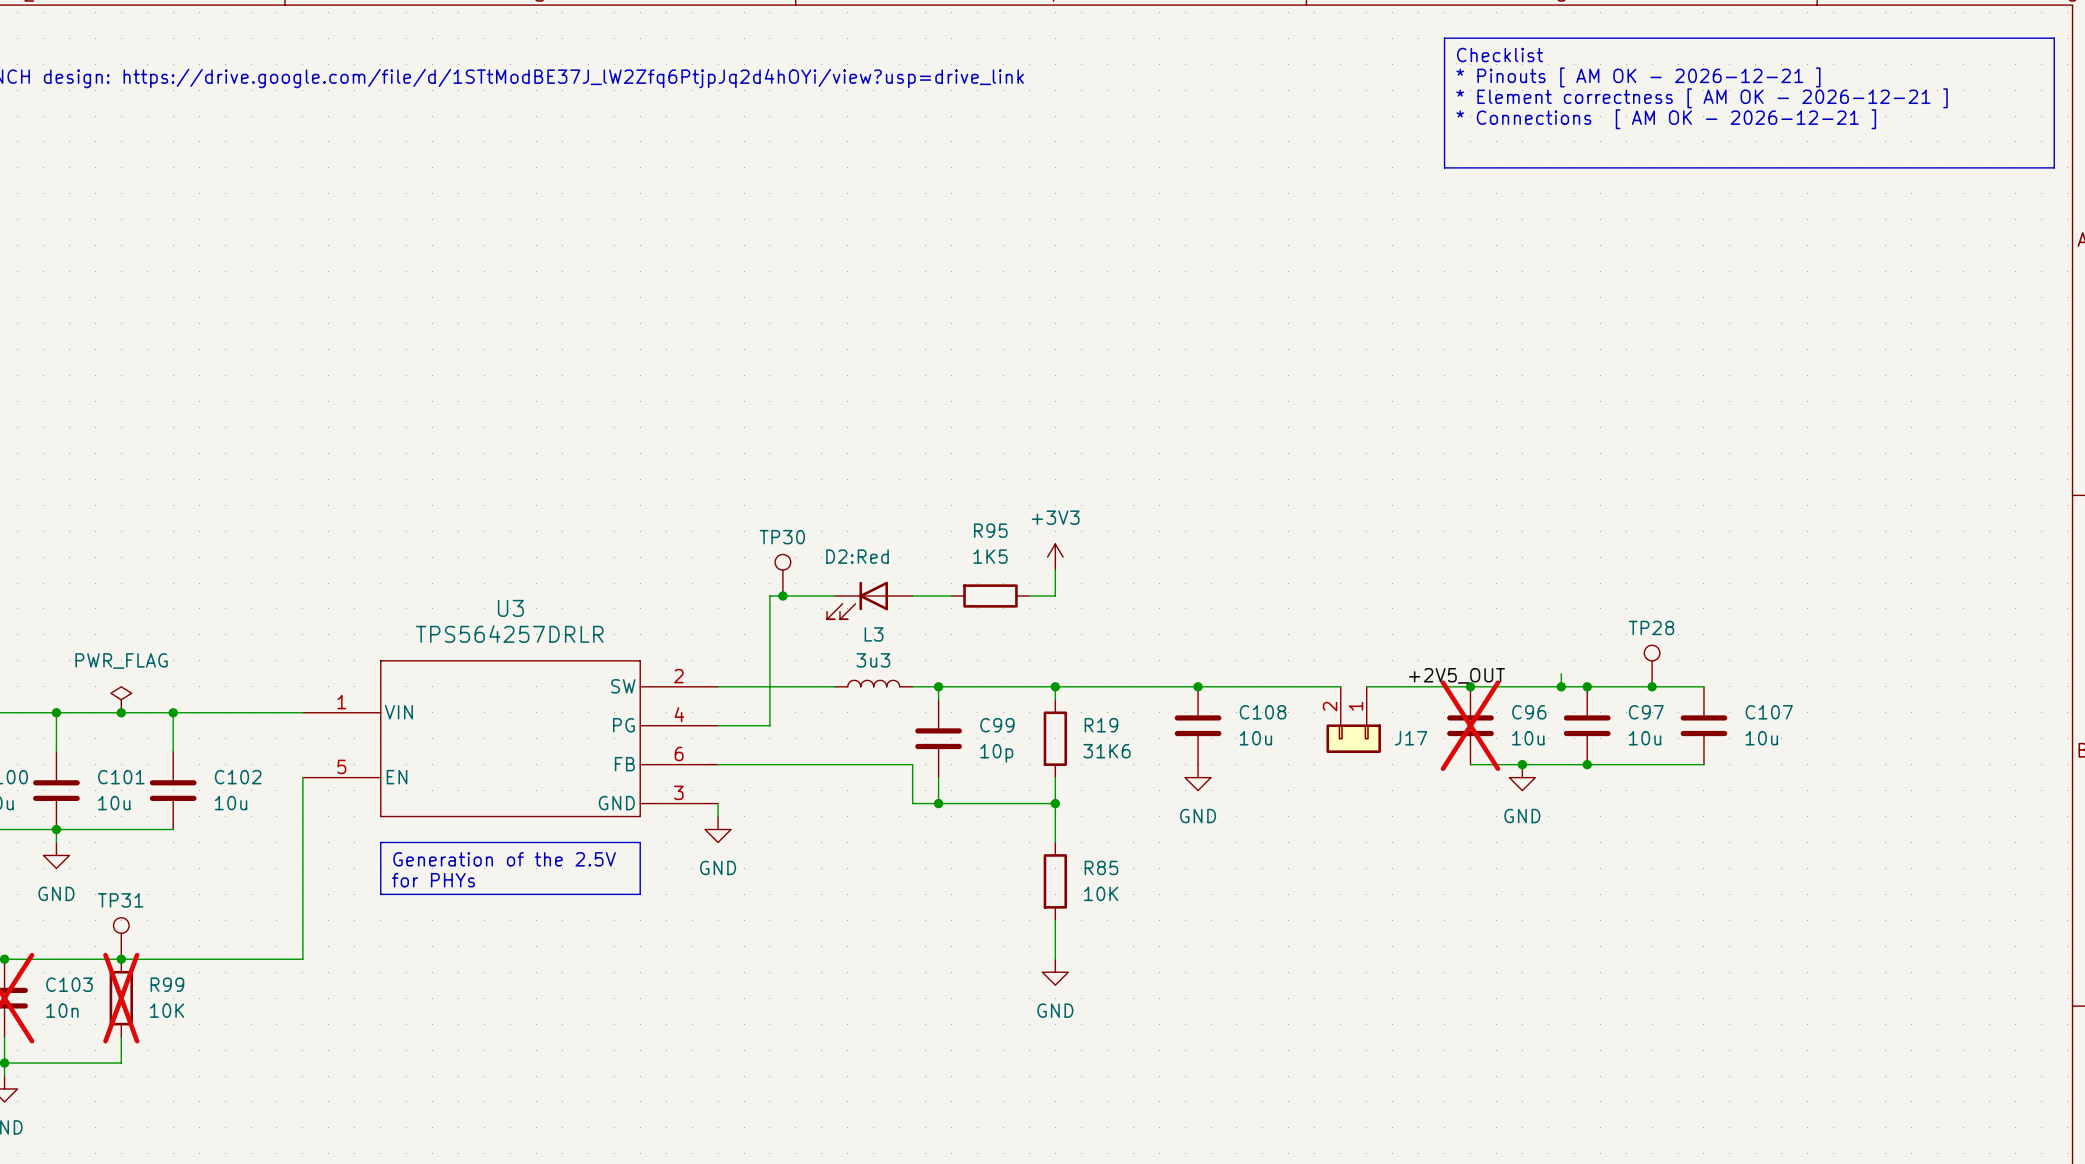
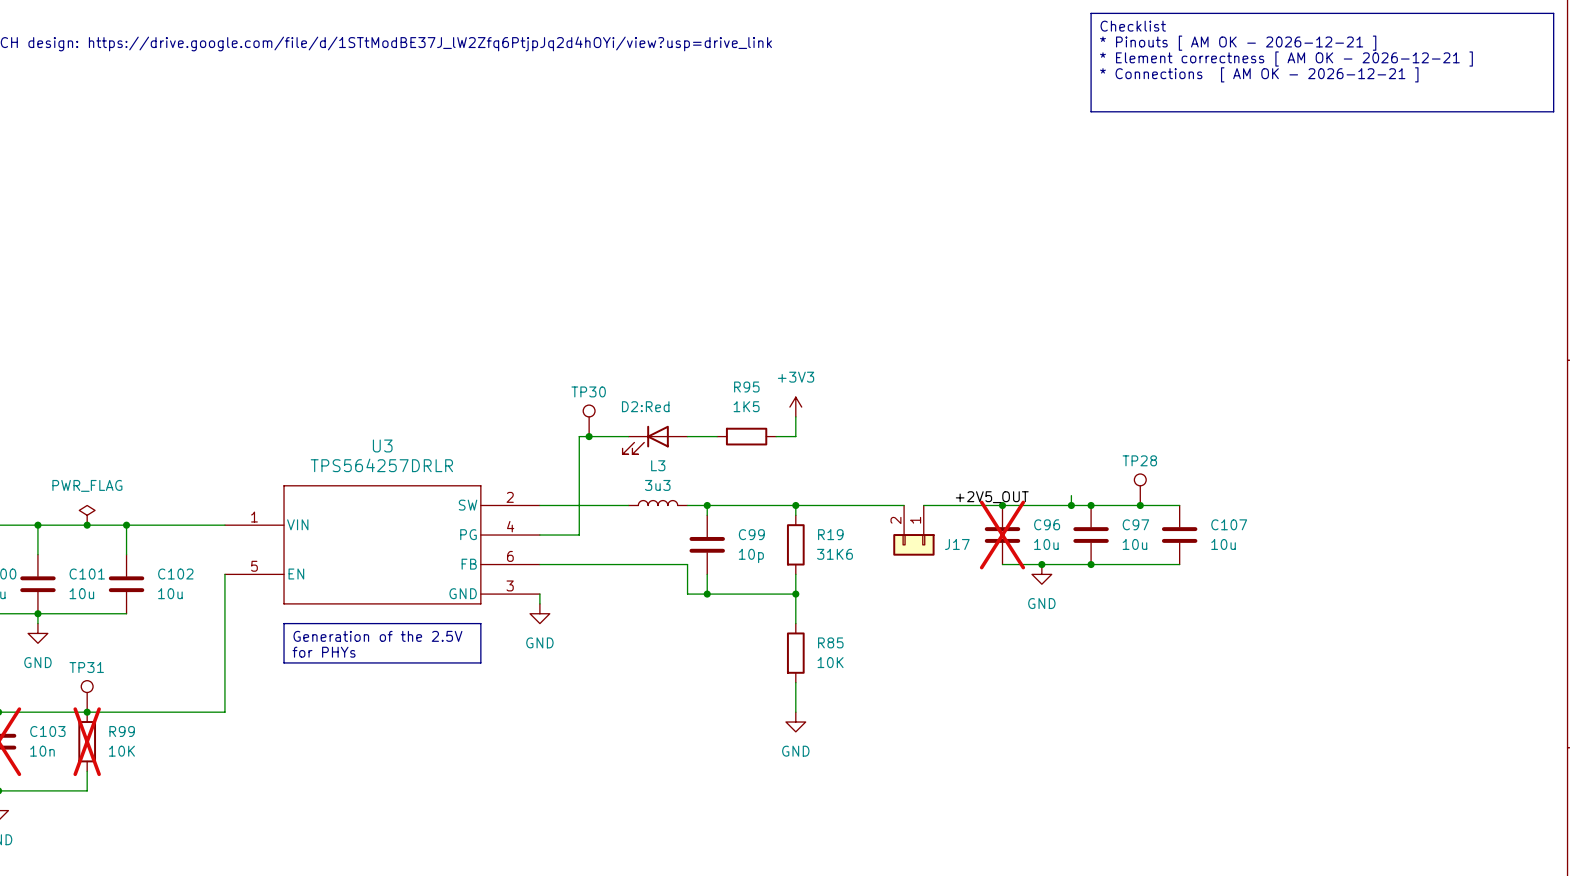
TP28 position: (1652, 666) -> (1140, 489)
wire: none -> (1071, 495) (1071, 505)
wire: (1561, 673) (1561, 686) (1703, 686) -> none
label position: +2V5_OUT (1456, 675) -> +2V5_OUT (992, 497)
wire: (1198, 686) (1223, 686) -> (1012, 505) (1032, 505)
junction: (1198, 686) -> none
junction: none -> (1002, 505)
junction: none -> (1071, 505)
junction: none -> (1091, 505)
junction: (1470, 686) -> none
junction: none -> (1140, 505)
junction: (1561, 686) -> none
junction: (1587, 686) -> none
junction: (1652, 686) -> none
J17 position: (1353, 719) -> (913, 530)
C108: 10u (1198, 725) -> none
C96 position: (1470, 725) -> (1002, 535)
C97 position: (1587, 725) -> (1091, 535)
C107 position: (1703, 725) -> (1179, 535)
junction: none -> (1041, 564)
junction: none -> (1091, 564)
junction: (1522, 764) -> none
wire: (1561, 764) (1703, 764) -> (1002, 564) (1110, 564)
junction: (1587, 764) -> none
power symbol: GND (1198, 777) -> none
power symbol: none -> GND (1041, 574)
power symbol: GND (1522, 777) -> none

